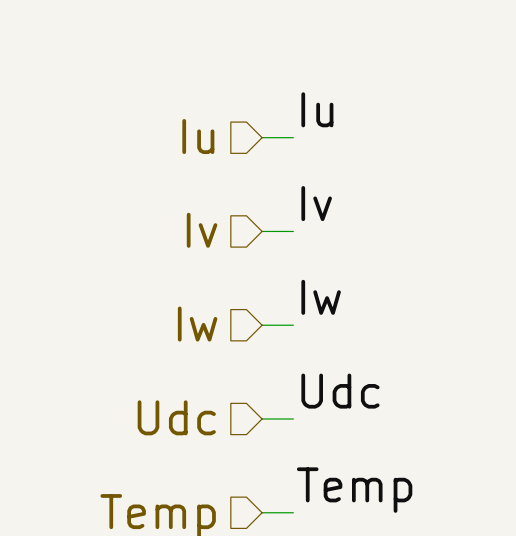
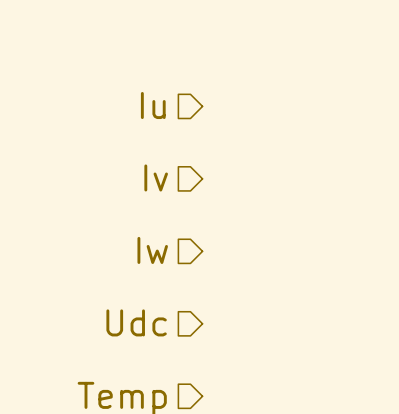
label: Iu (317, 109) -> none
wire: (262, 137) (293, 137) -> none
label: Iv (316, 203) -> none
wire: (262, 231) (293, 231) -> none
label: Iw (321, 297) -> none
wire: (262, 325) (293, 325) -> none
label: Udc (340, 391) -> none
wire: (262, 418) (293, 418) -> none
label: Temp (354, 490) -> none
wire: (262, 512) (293, 512) -> none

